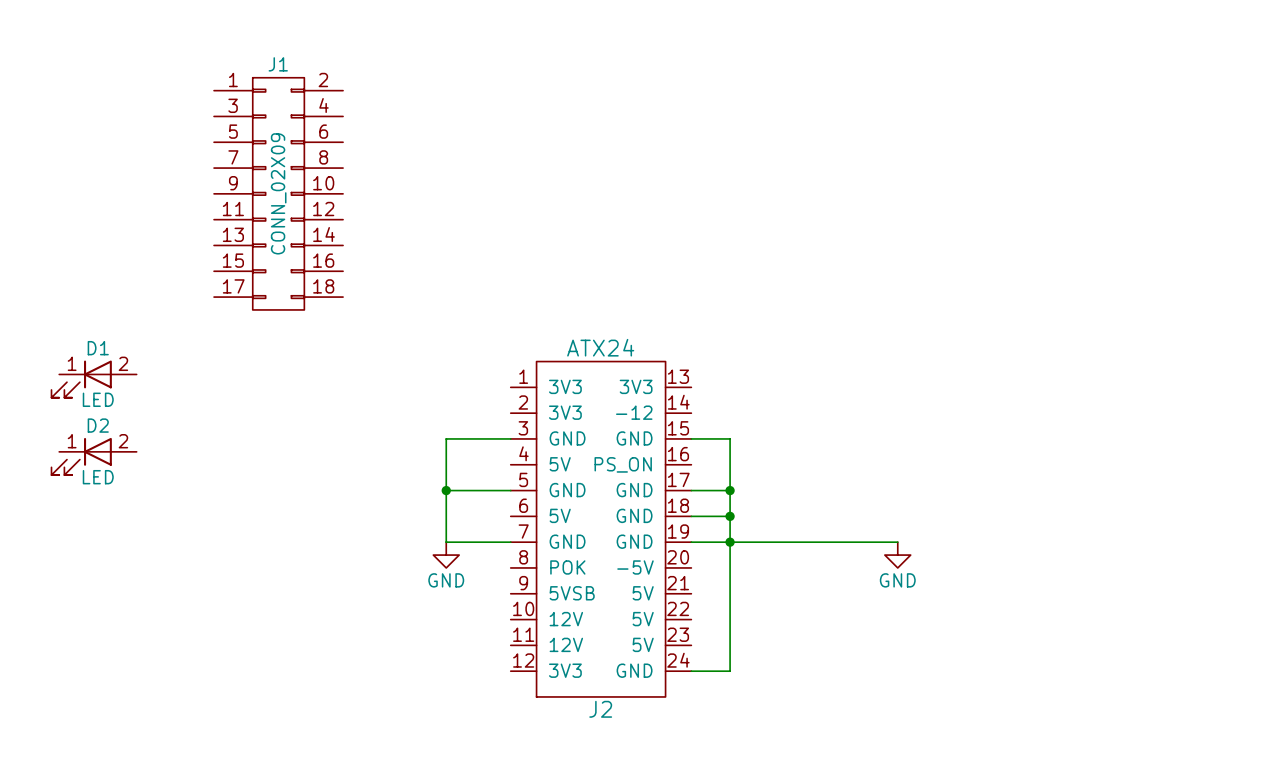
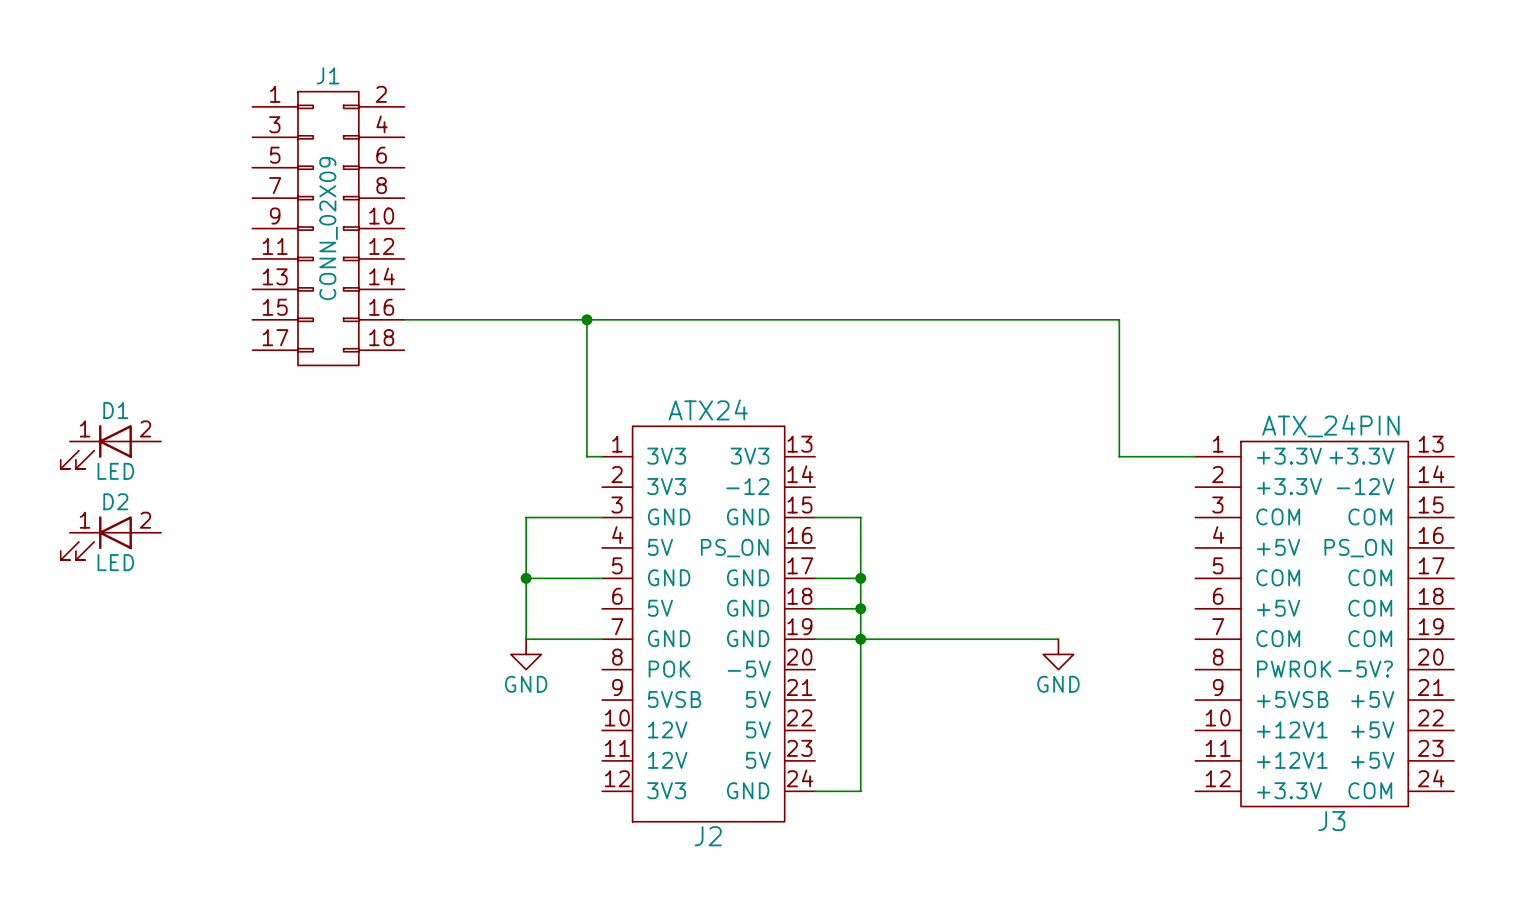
wire: none -> (404, 319) (1119, 319) (1119, 456) (1195, 456)
wire: none -> (586, 319) (586, 456) (602, 456)
junction: none -> (586, 319)
J3: none -> ATX_24PIN (1324, 624)

